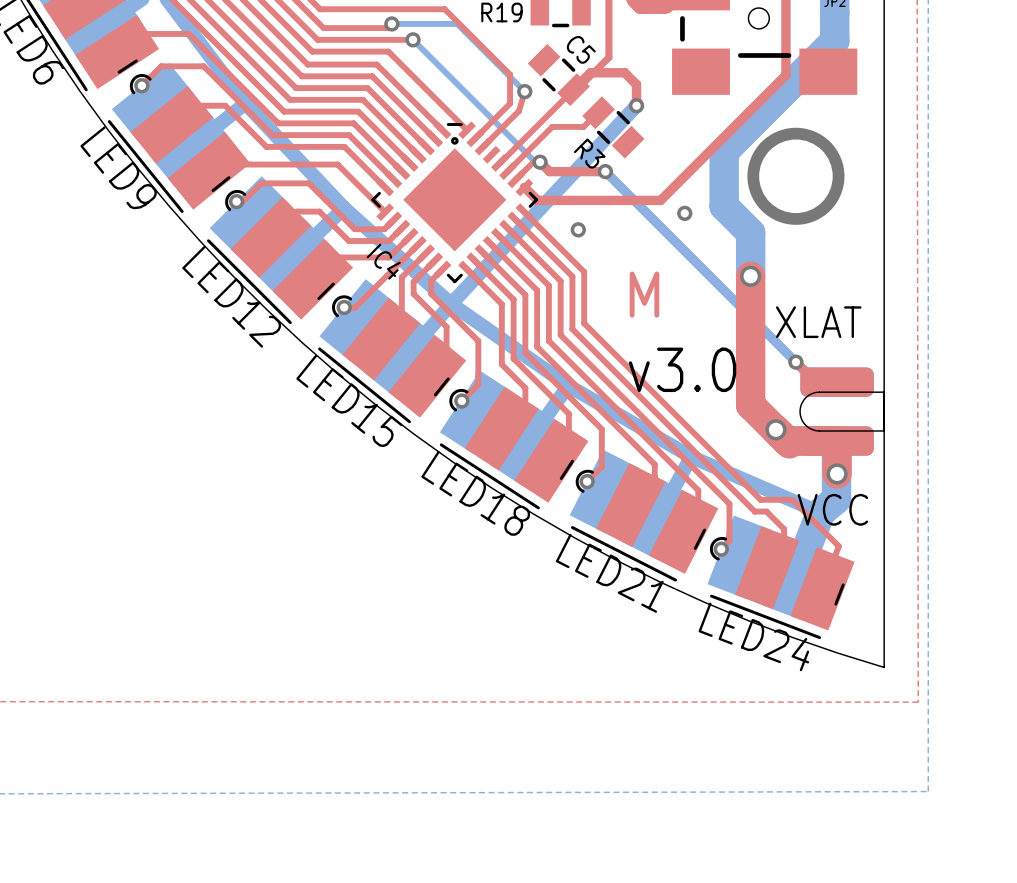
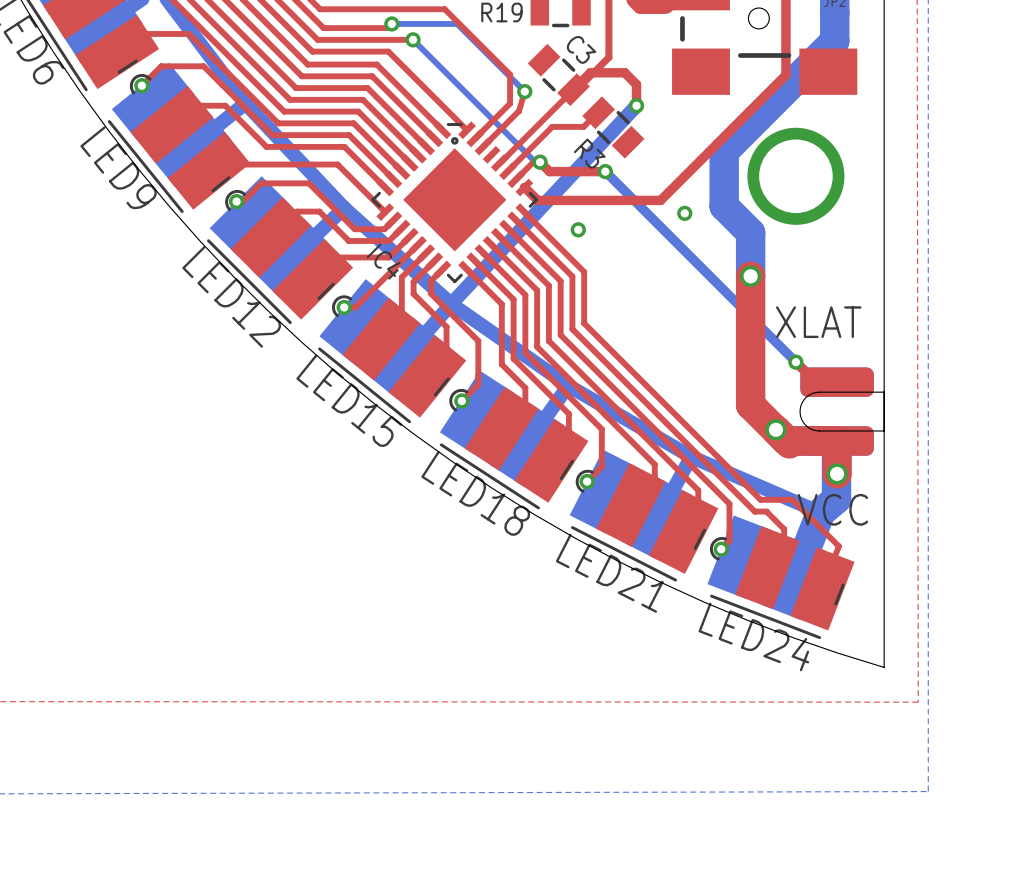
C5 name: C5 (581, 49) -> C3 (581, 49)
text: M (644, 294) -> none
text: v3.0 (682, 369) -> none

